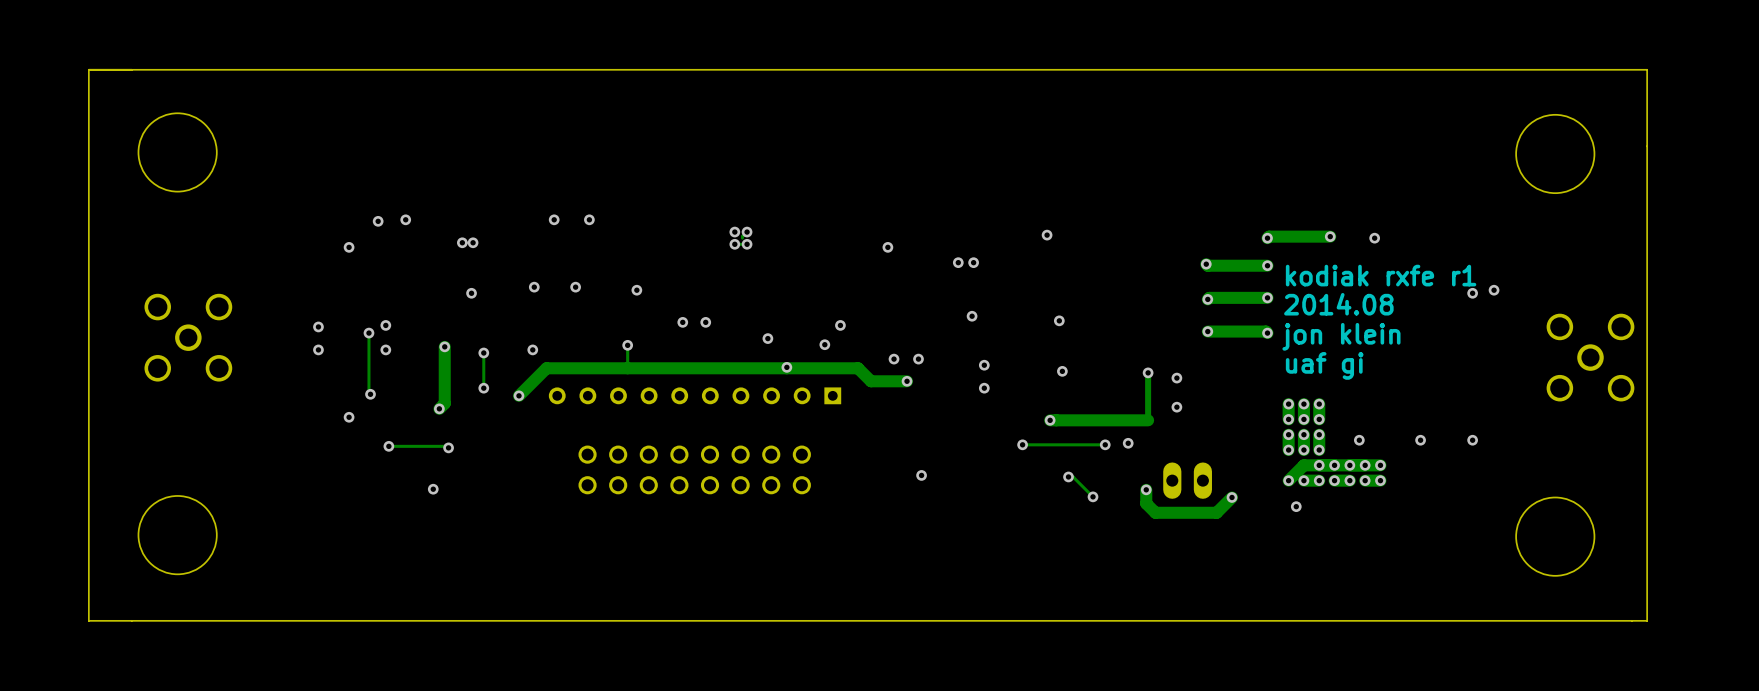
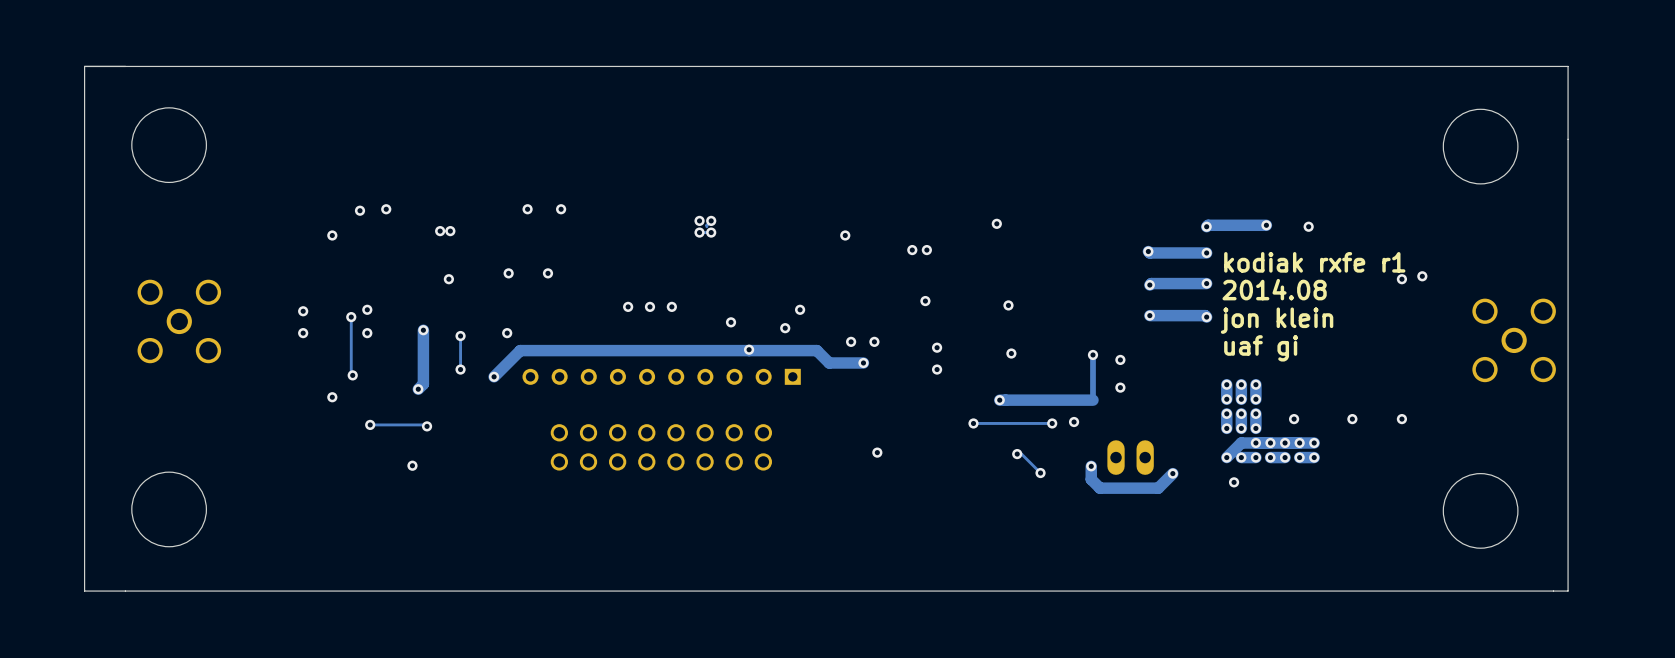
via: (636, 290) -> none
via: none -> (628, 306)
track: (627, 345) (627, 368) -> none
via: (627, 345) -> none

